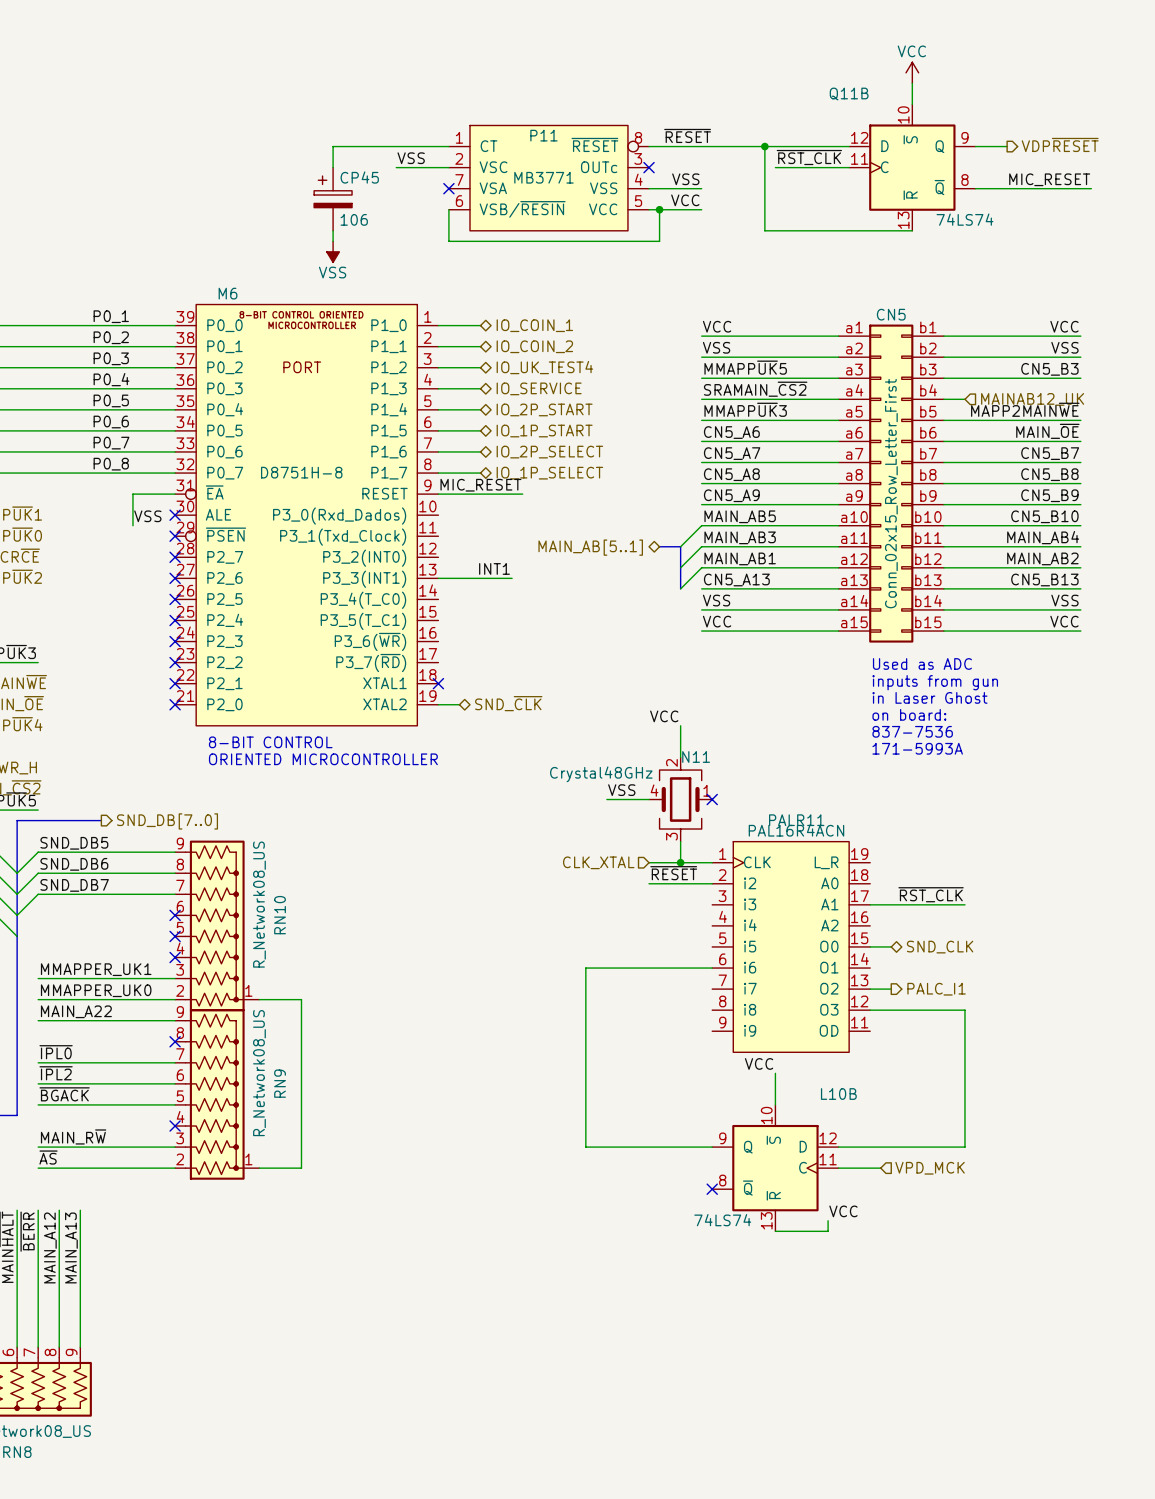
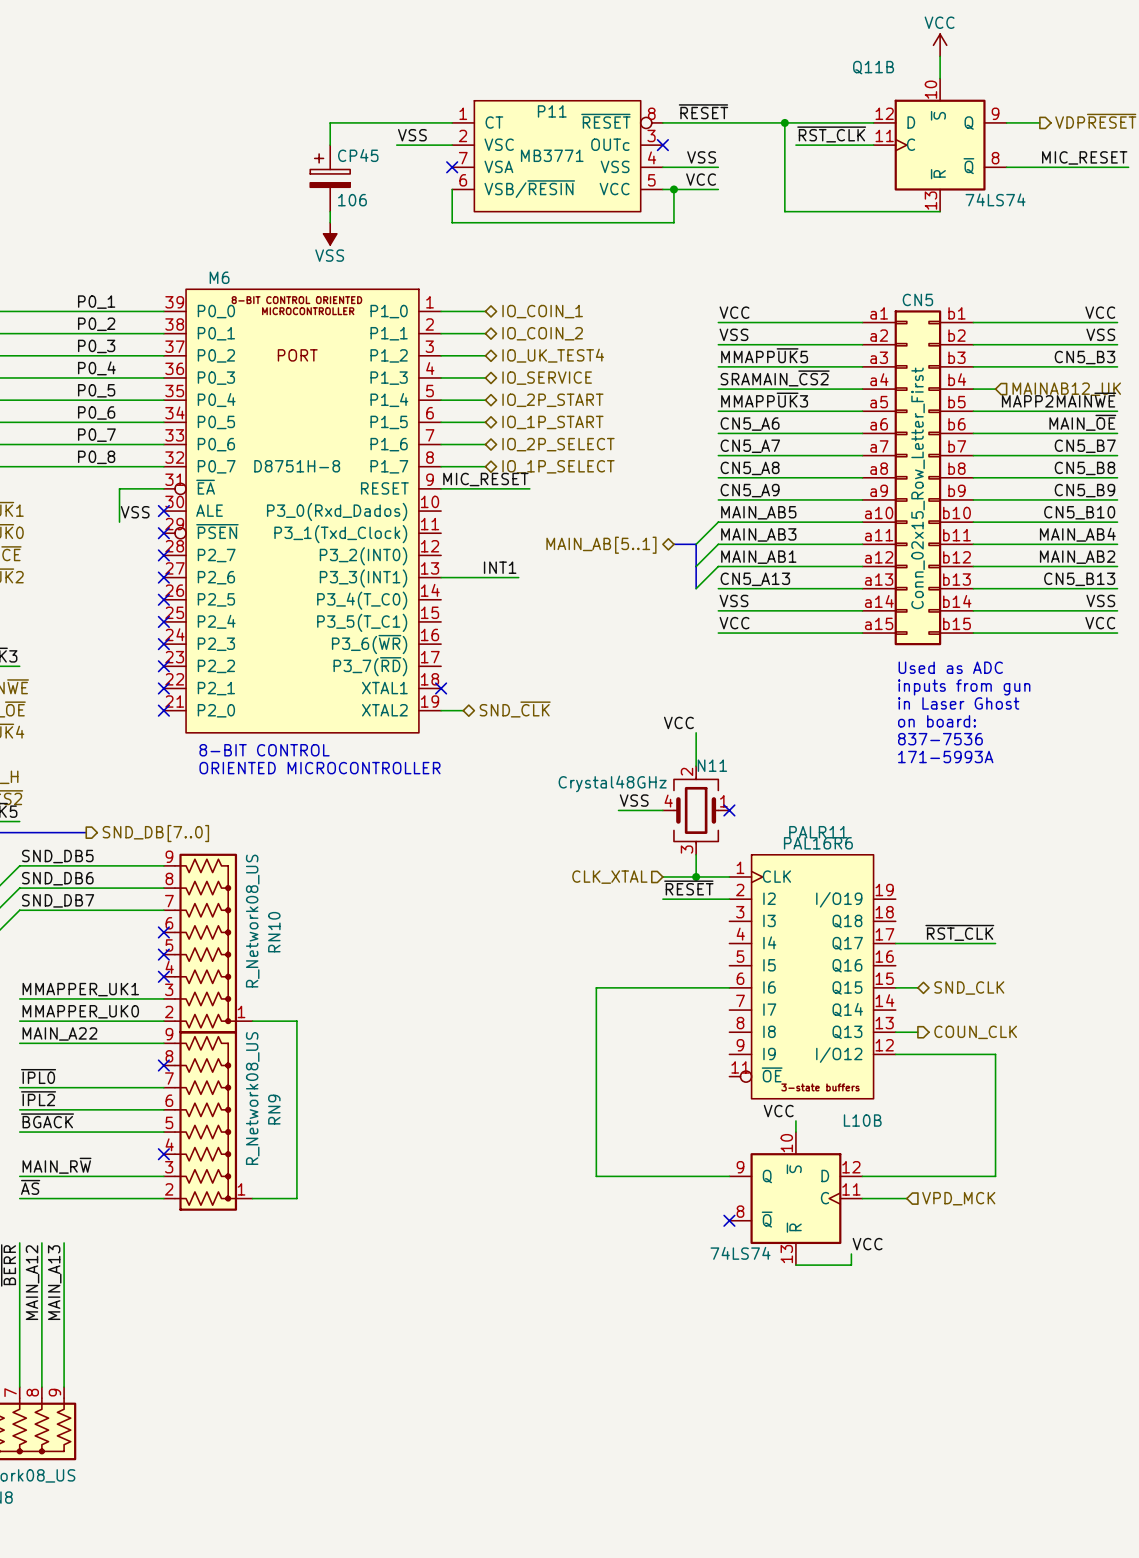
PALR11 value: PAL16R4ACN (796, 830) -> PAL16R6 (818, 843)
PALR11 symbol: [712, 841, 871, 1053] -> [729, 854, 896, 1099]
label position: ~{RST_CLK} (931, 894) -> ~{RST_CLK} (959, 932)
wire: (870, 904) (964, 904) -> (895, 943) (995, 943)
wire: (870, 946) (891, 946) -> (895, 987) (917, 987)
hierarchical label position: SND_CLK (940, 947) -> SND_CLK (969, 987)
wire: (870, 989) (891, 989) -> none
hierarchical label: PALC_I1 (936, 989) -> none
wire: (891, 1010) (964, 1010) (964, 1031) -> (895, 1054) (995, 1054)
hierarchical label: none -> COUN_CLK (975, 1032)
label position: VCC (759, 1063) -> VCC (778, 1111)
wire: (775, 1073) (775, 1094) -> none

